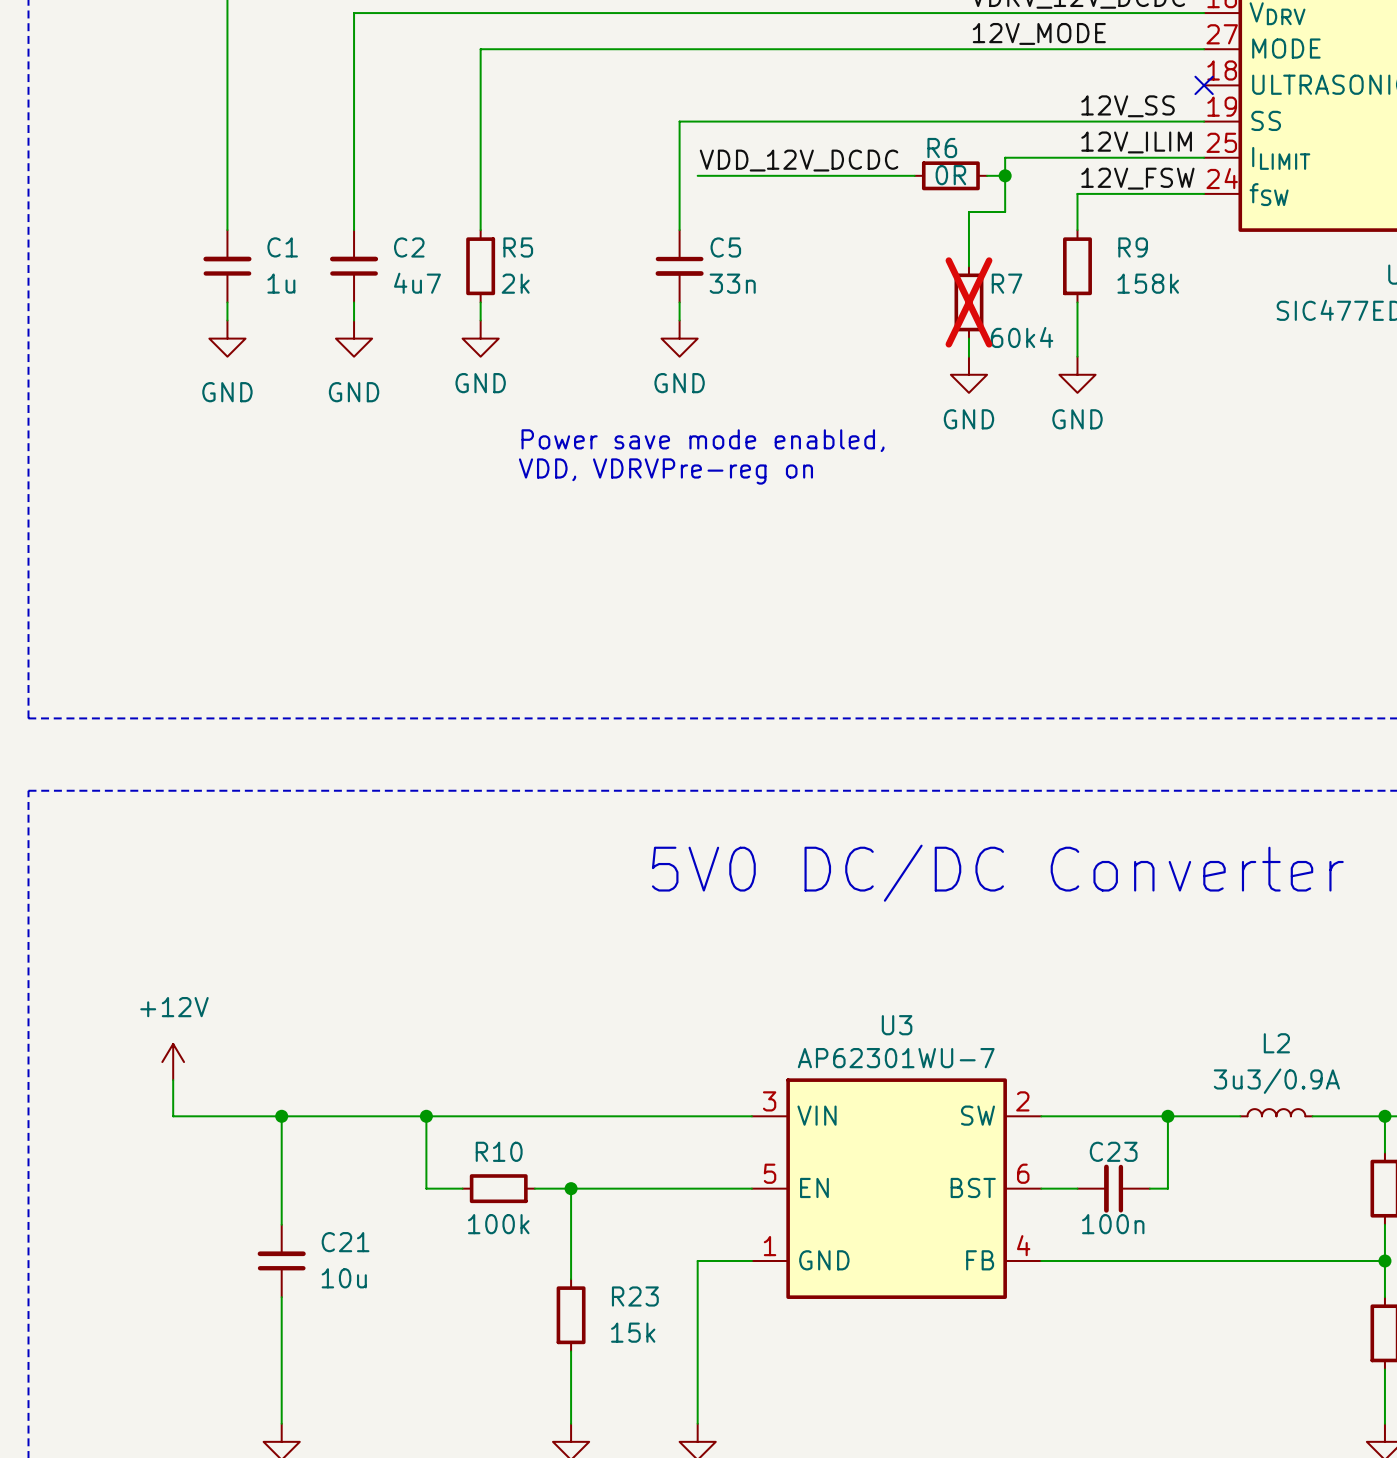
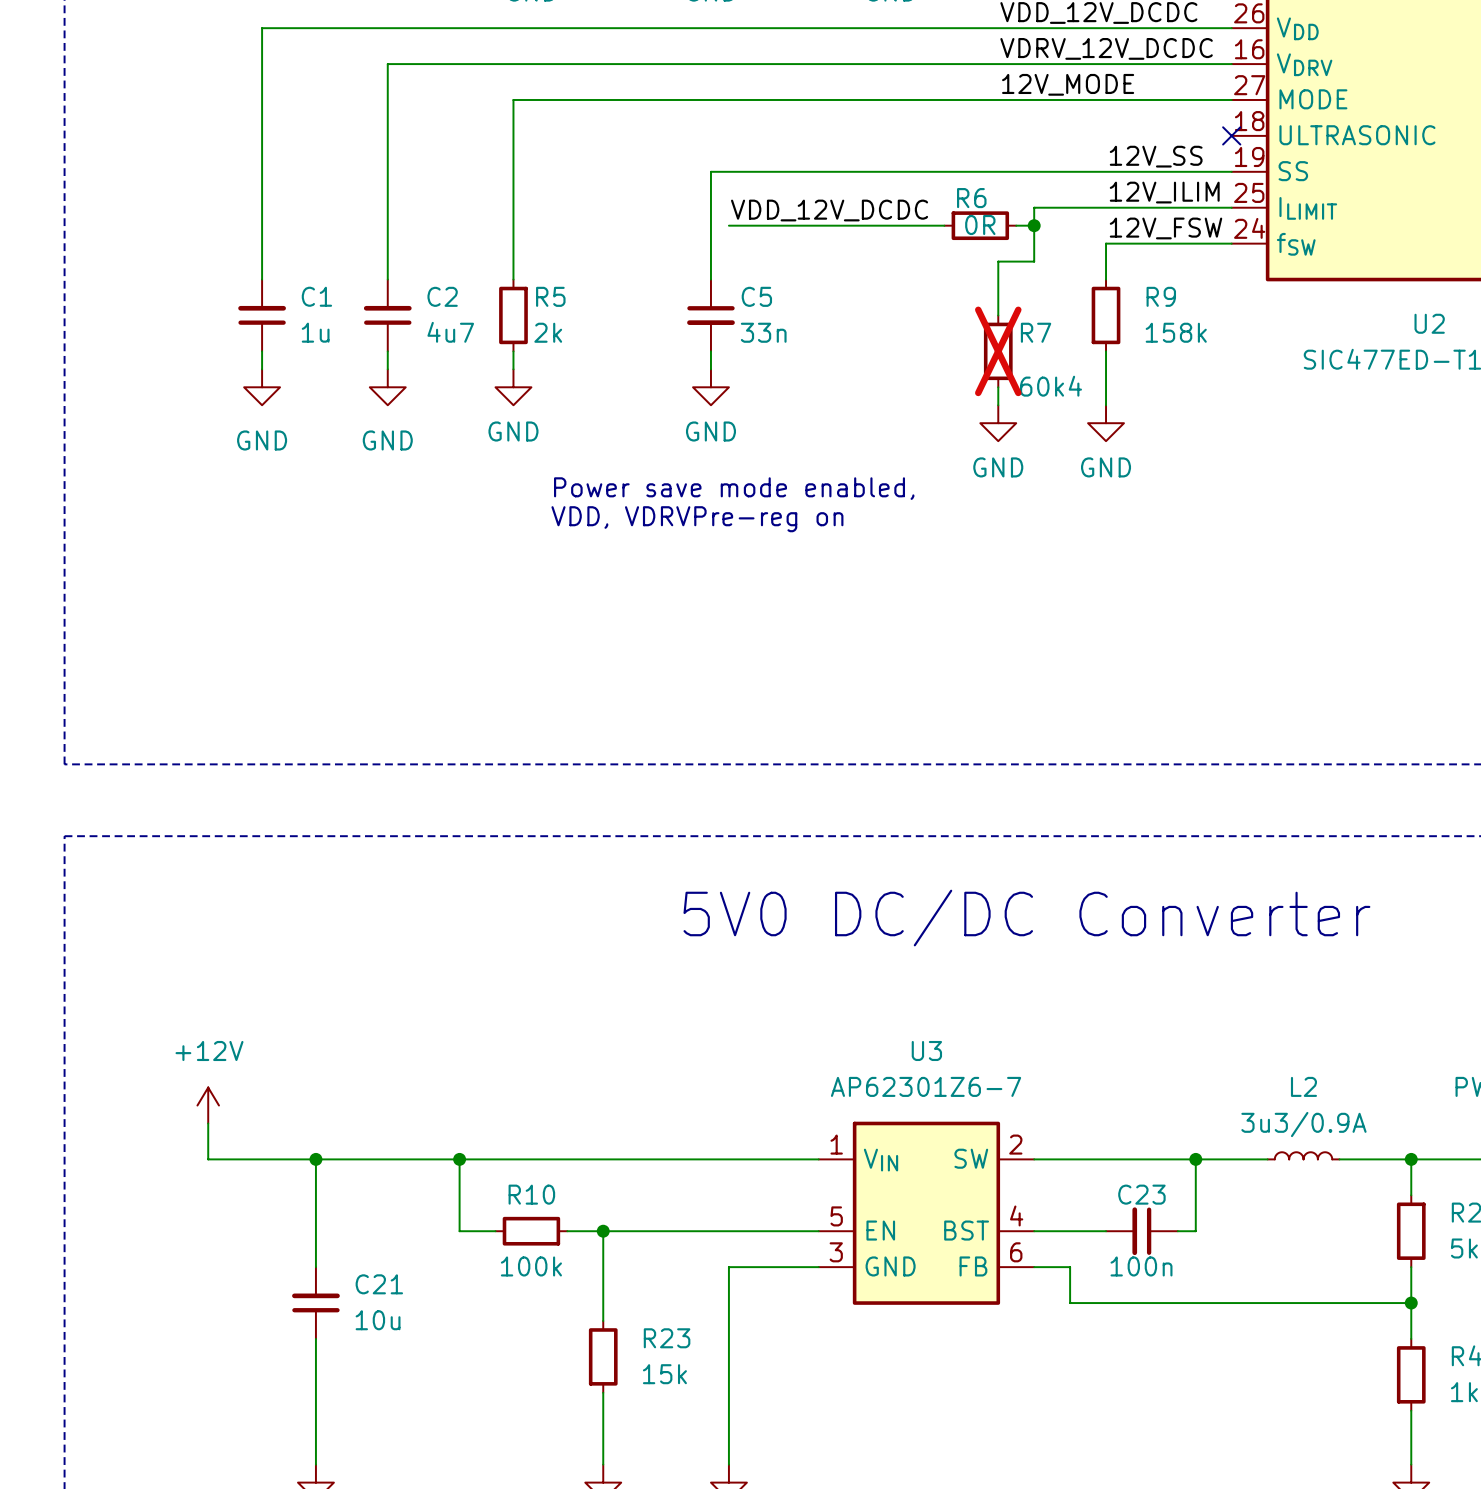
U3 text: none -> AP62301Z6-7 (926, 1086)
U3 value: AP62301WU-7 (896, 1058) -> none
U3 symbol: [751, 1078, 1042, 1299] -> [818, 1121, 1035, 1305]
wire: none -> (1034, 1267) (1070, 1267) (1070, 1303)
wire: (697, 1260) (751, 1260) -> (728, 1303) (728, 1267) (818, 1267)

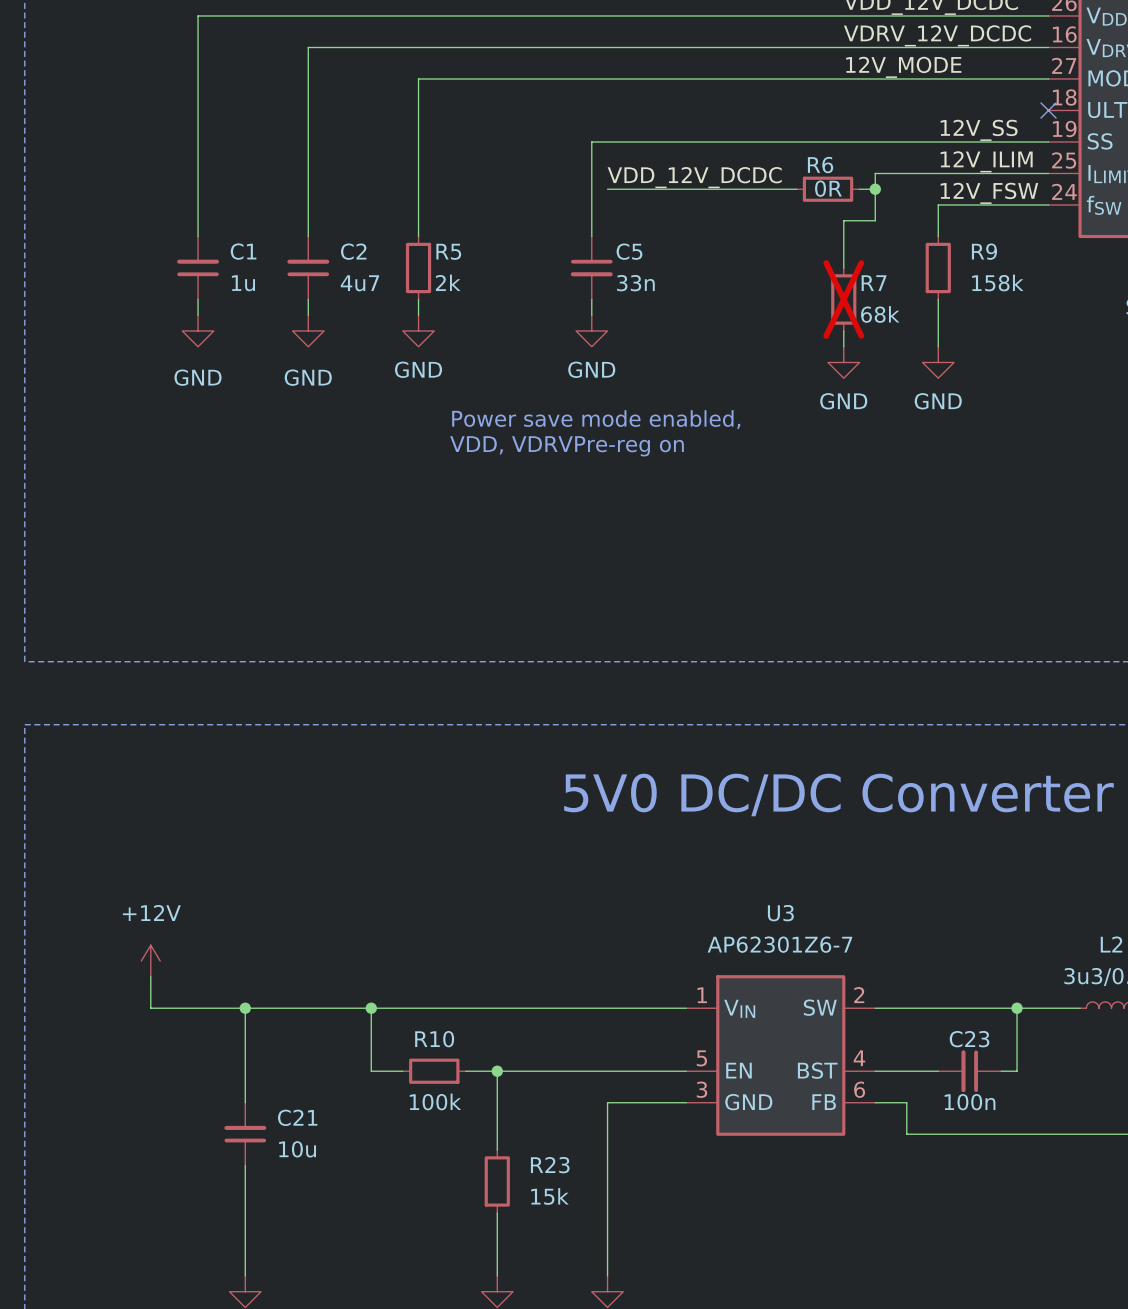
R7 text: 60k4 (1051, 386) -> 68k (880, 314)

